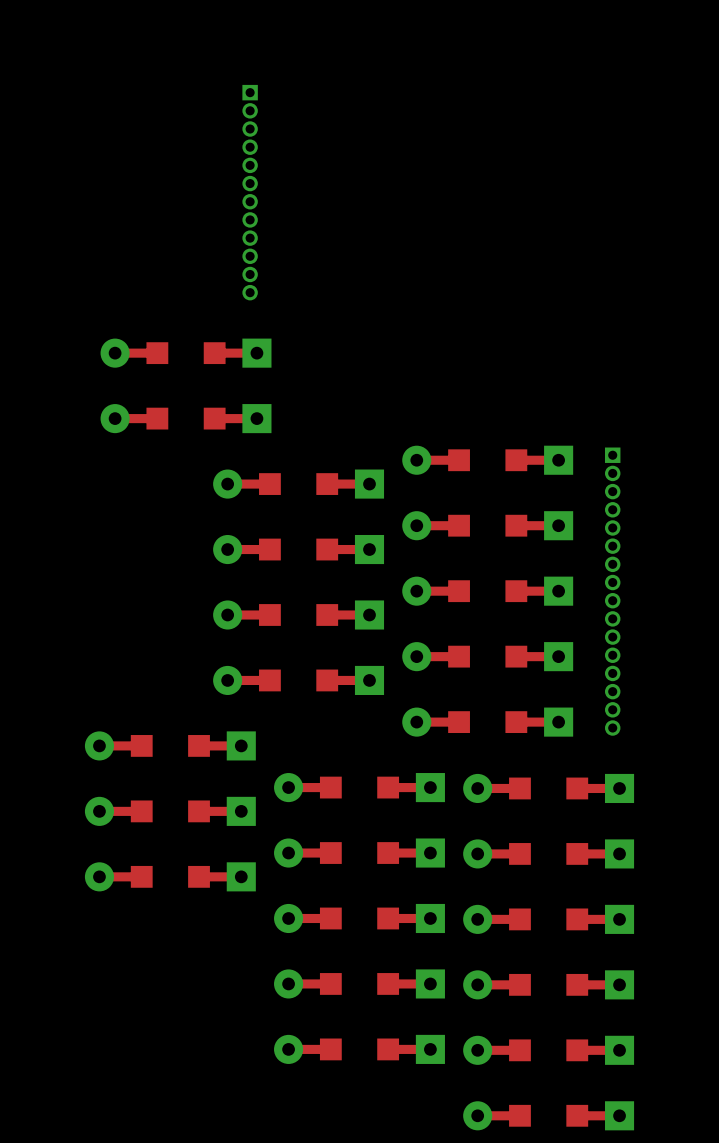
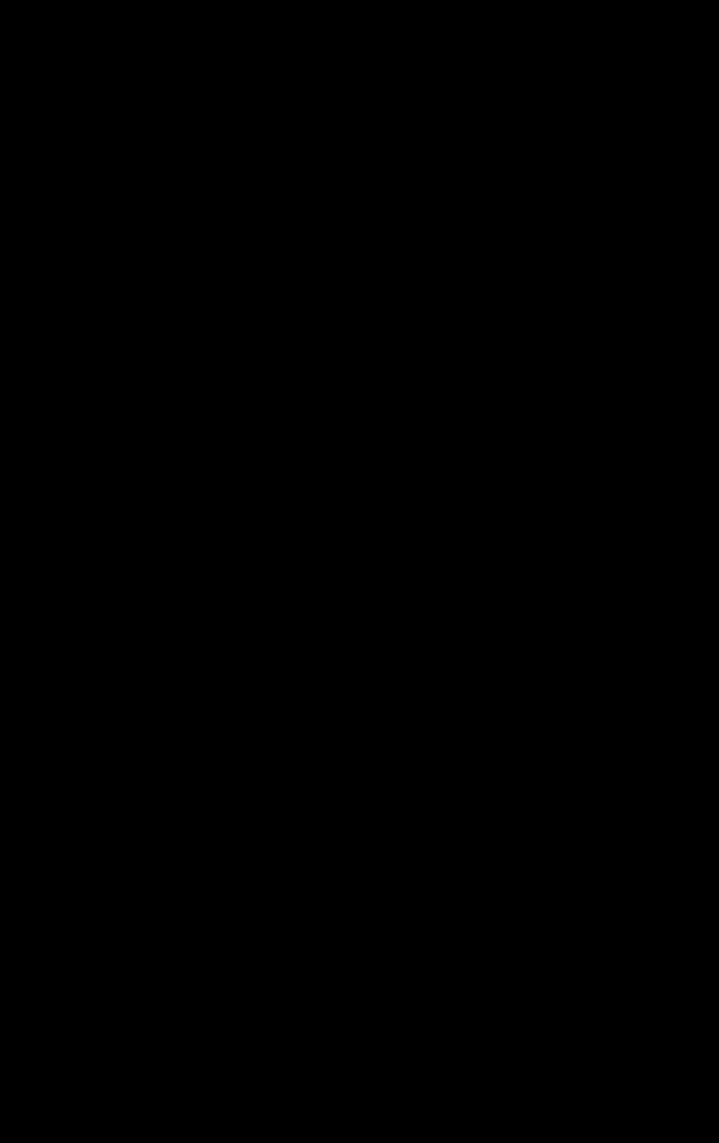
part: (250, 192) -> none
part: (186, 353) -> none
part: (186, 418) -> none
part: (487, 460) -> none
part: (298, 484) -> none
part: (487, 525) -> none
part: (298, 549) -> none
part: (487, 591) -> none
part: (612, 591) -> none
part: (298, 614) -> none
part: (487, 656) -> none
part: (298, 680) -> none
part: (487, 722) -> none
part: (170, 745) -> none
part: (359, 787) -> none
part: (548, 788) -> none
part: (170, 811) -> none
part: (359, 853) -> none
part: (548, 853) -> none
part: (170, 876) -> none
part: (359, 918) -> none
part: (548, 919) -> none
part: (359, 983) -> none
part: (548, 984) -> none
part: (359, 1049) -> none
part: (548, 1050) -> none
part: (548, 1115) -> none

